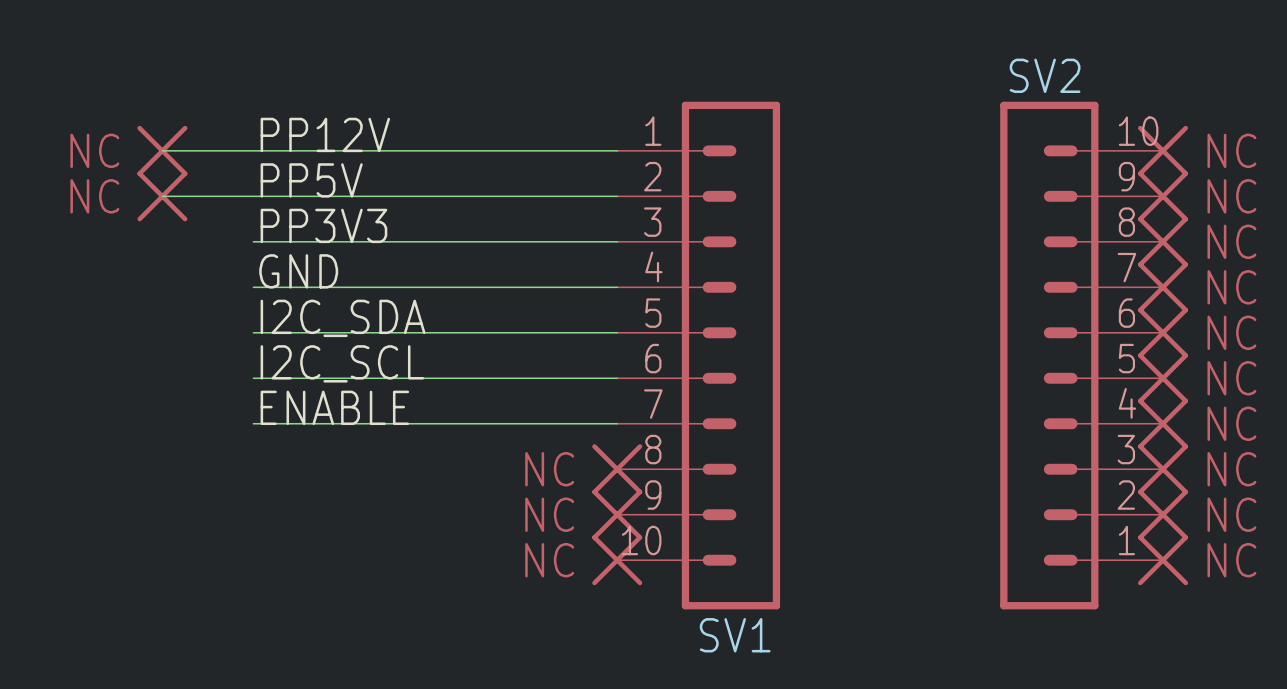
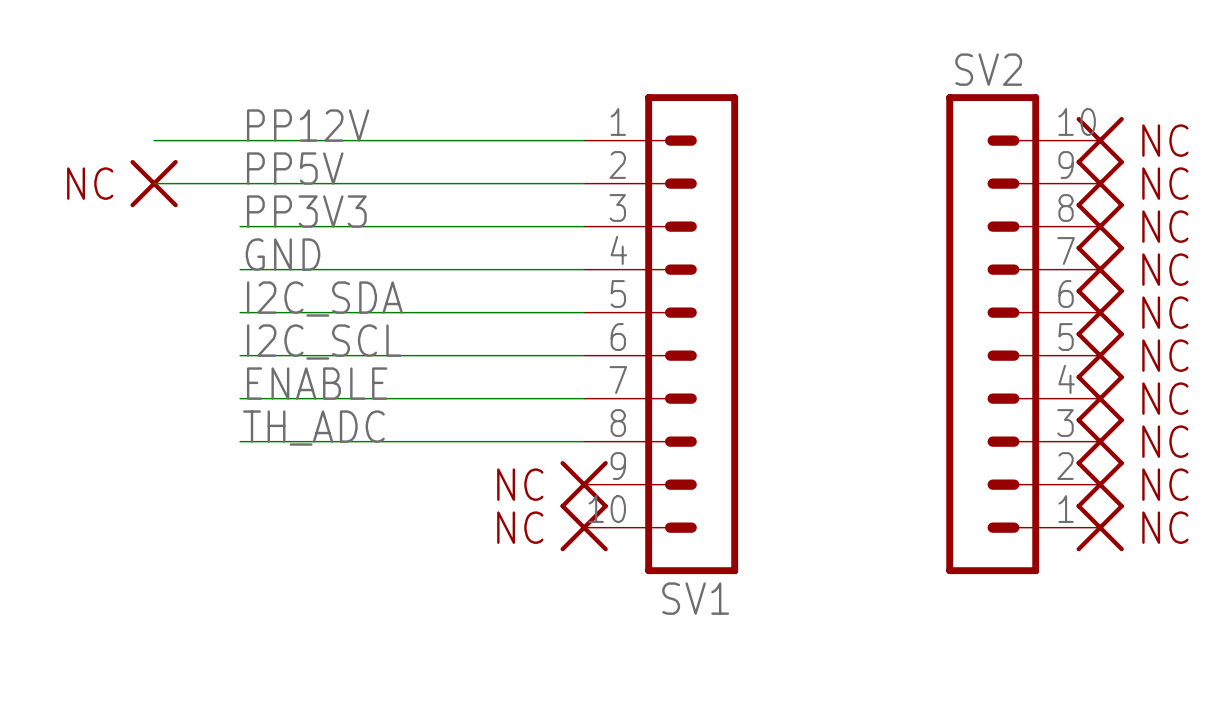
part: (162, 150) -> none
label: none -> TH_ADC (313, 428)
wire: none -> (240, 441) (584, 441)
part: (617, 469) -> none

